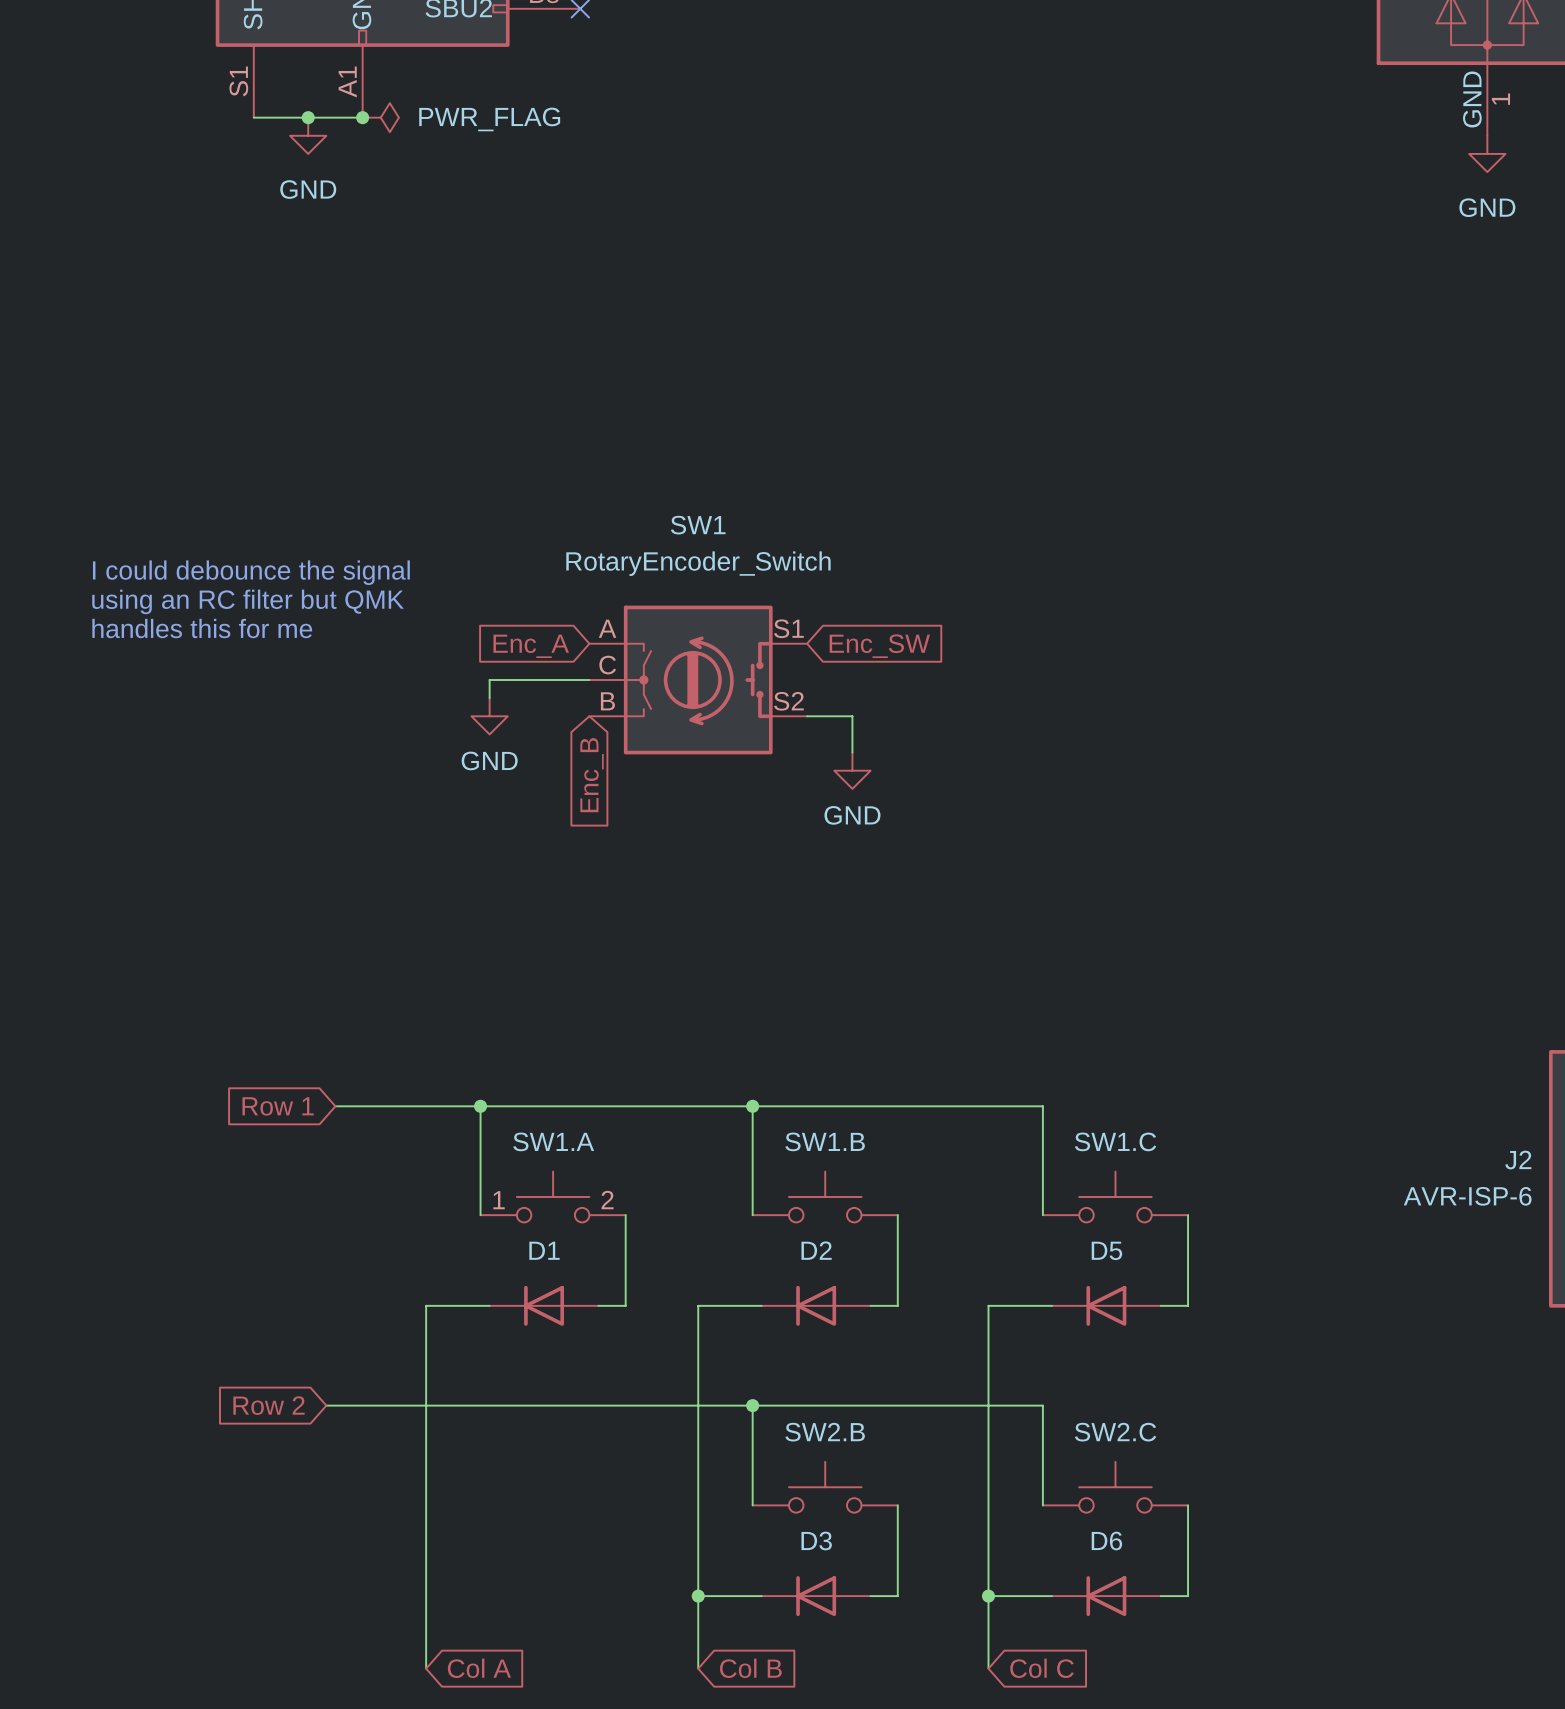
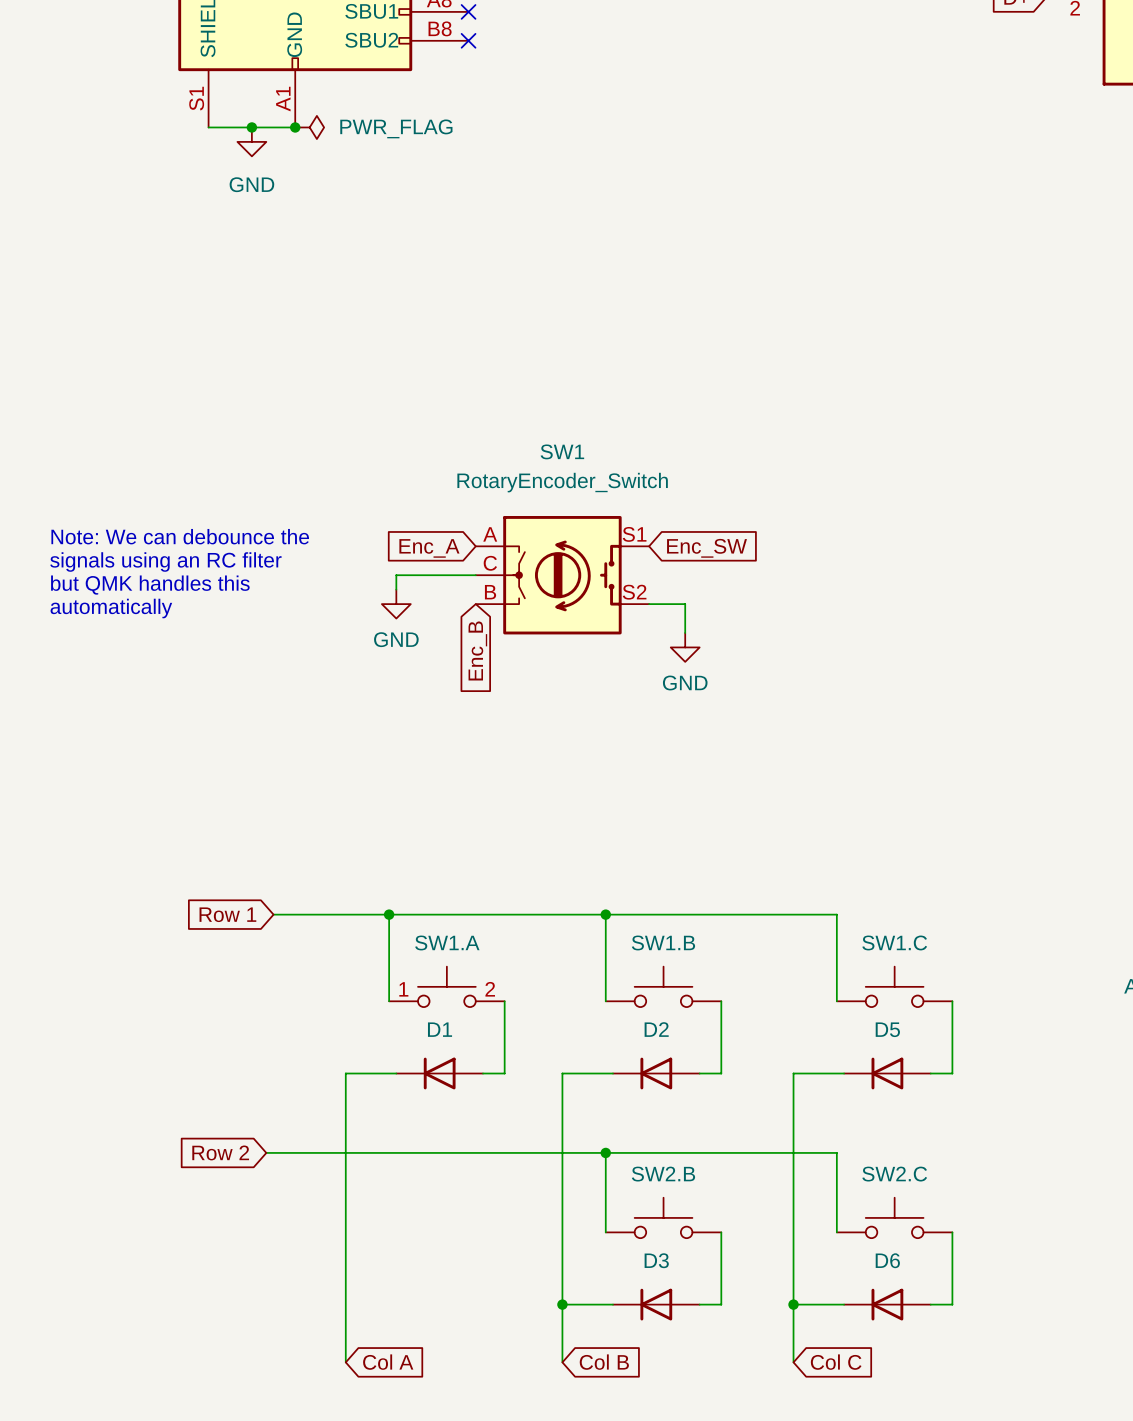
text: I could debounce the signal (251, 572) -> none
text: using an RC filter but QMK (248, 601) -> none
text: handles this for me (202, 628) -> none
text: none -> Note: We can debounce the (180, 536)
text: none -> signals using an RC filter (165, 562)
text: none -> but QMK handles this (150, 585)
text: none -> automatically (111, 608)

